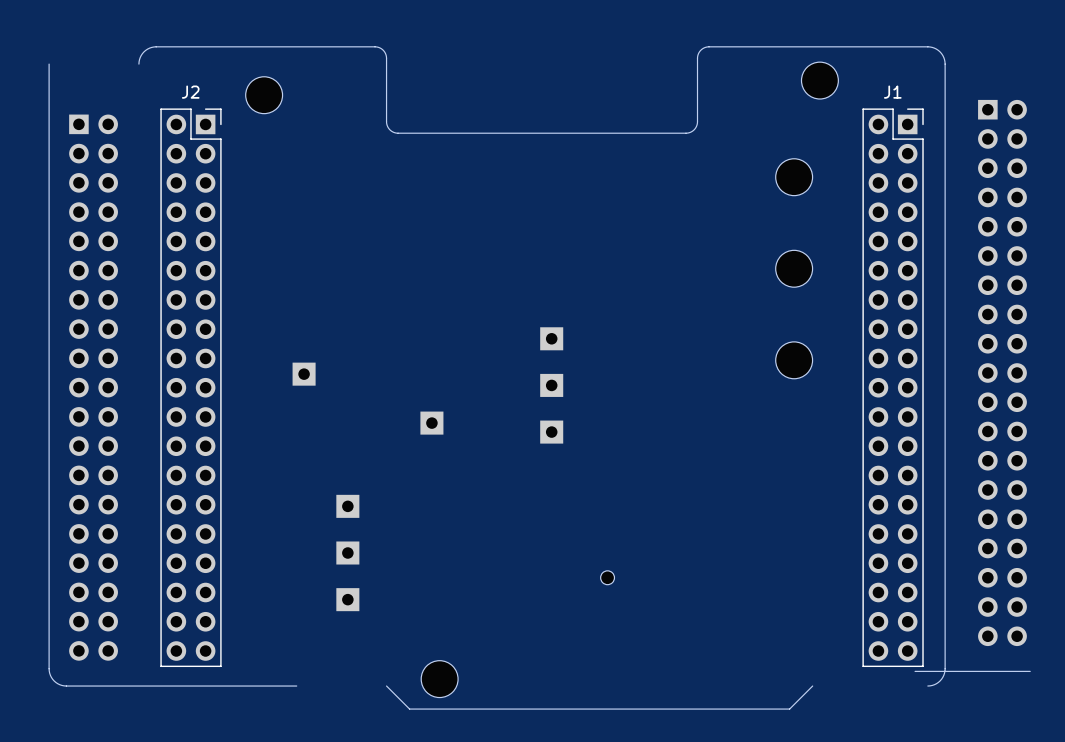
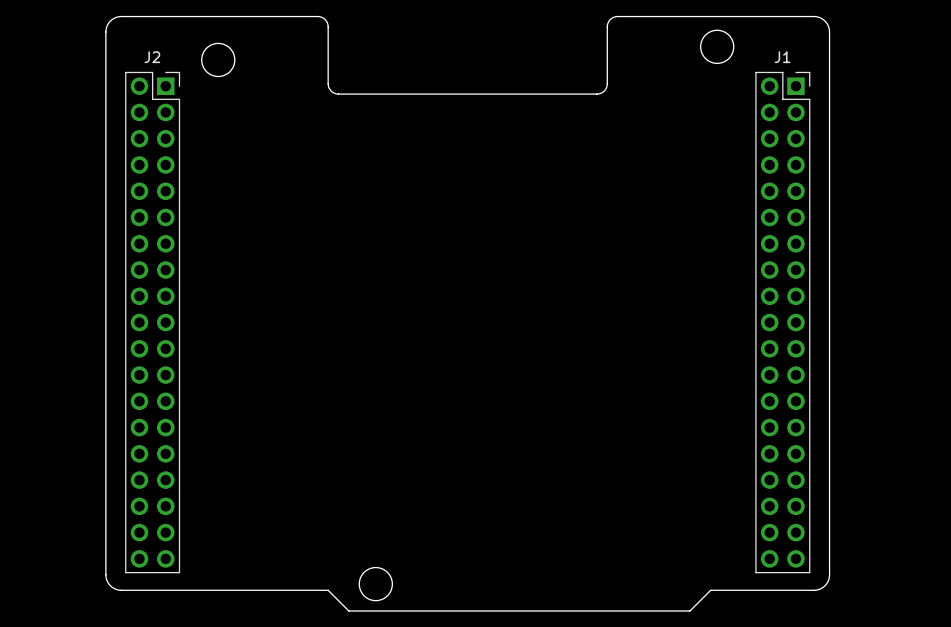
board edge: (49, 64) (49, 671) (54, 680) (64, 685) (156, 686) -> (105, 32) (105, 574) (110, 585) (121, 590)
part: (794, 177) -> none
part: (794, 268) -> none
part: (551, 338) -> none
part: (794, 360) -> none
part: (1002, 372) -> none
part: (304, 374) -> none
part: (551, 385) -> none
part: (93, 387) -> none
part: (431, 423) -> none
part: (551, 432) -> none
part: (347, 506) -> none
part: (347, 553) -> none
part: (607, 577) -> none
part: (347, 599) -> none
board edge: (1030, 671) (915, 671) -> (814, 590) (710, 590)
board edge: none -> (328, 590) (247, 590)

